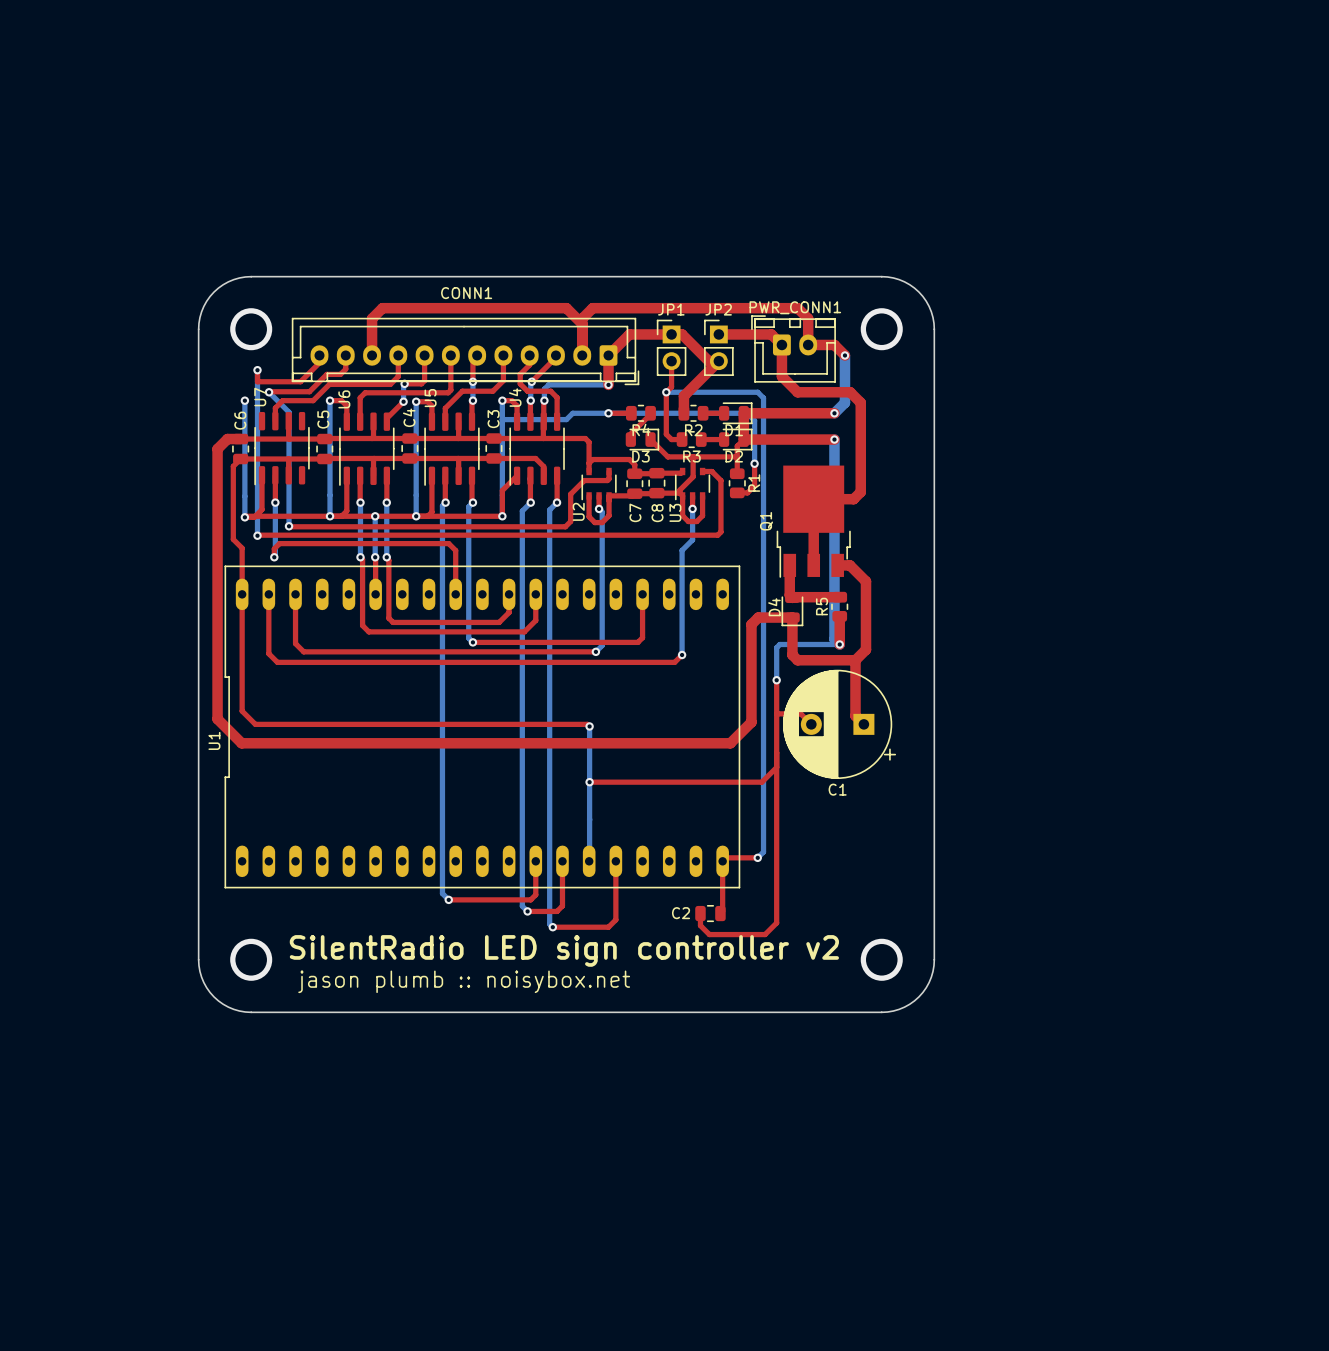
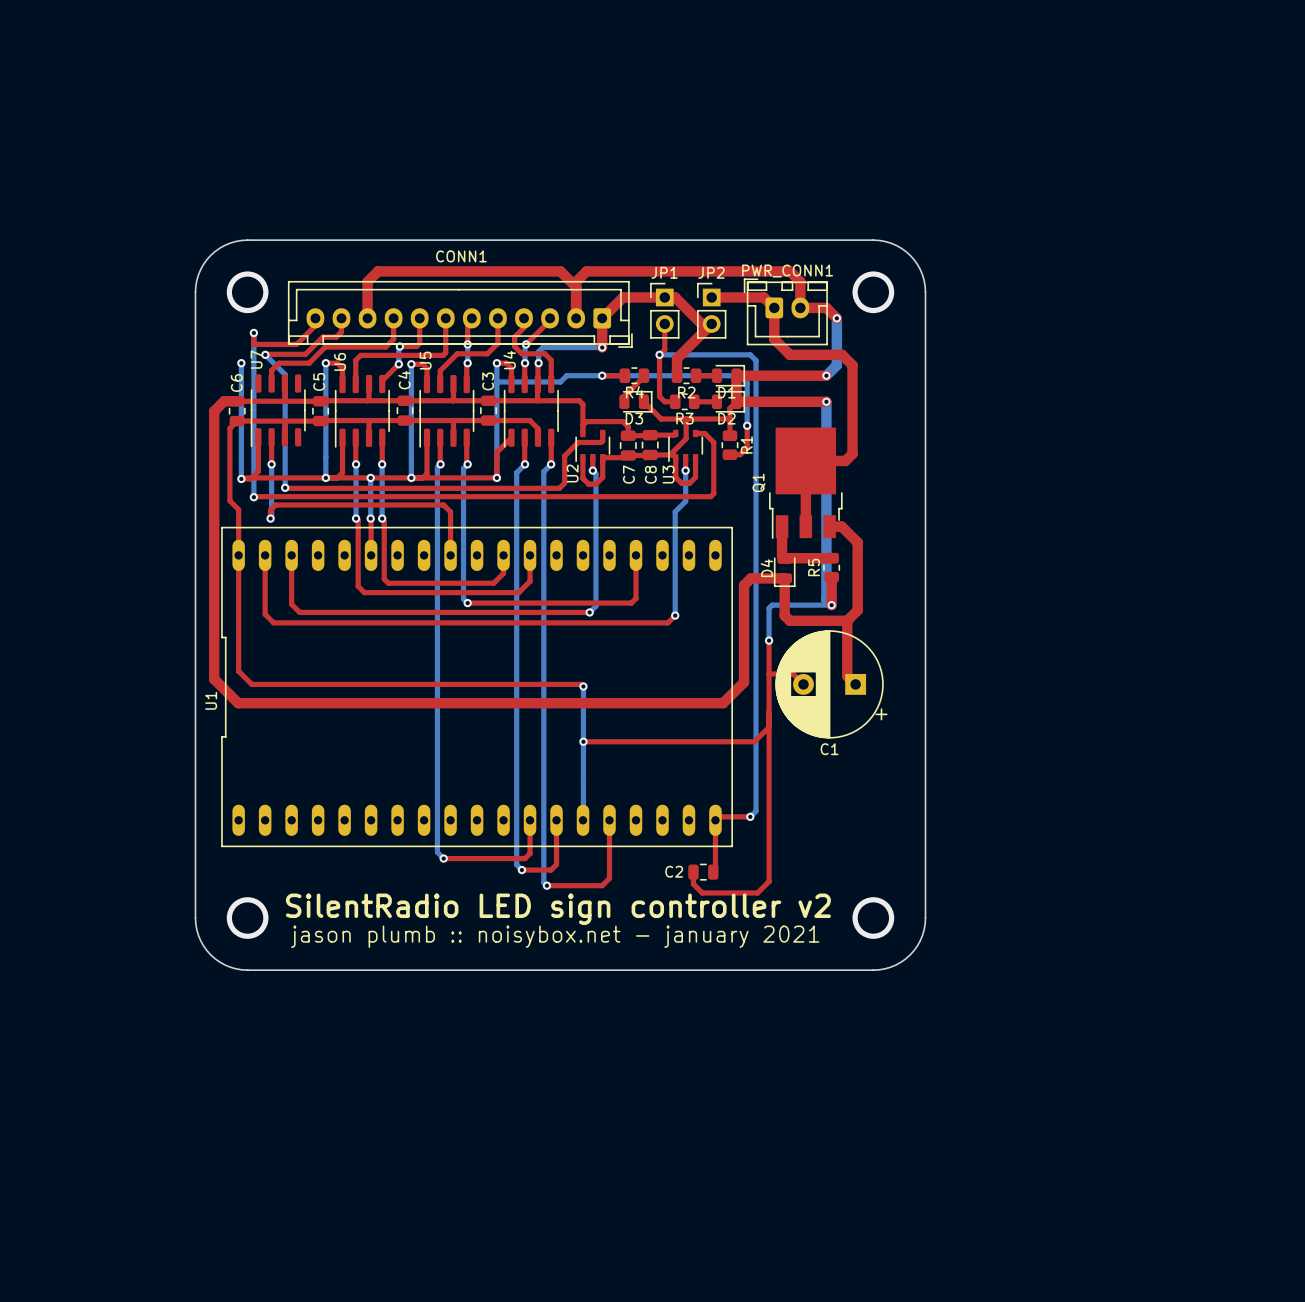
text: jason plumb :: noisybox.net (464, 981) -> jason plumb :: noisybox.net - january 2021 (555, 936)

